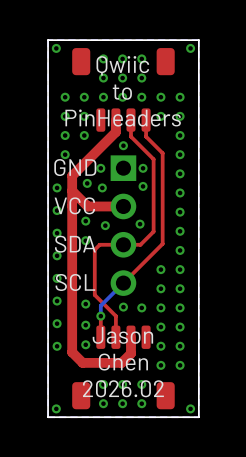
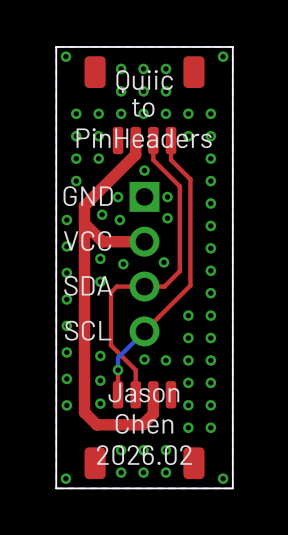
text: Qwiic (122, 65) -> Quiic (144, 81)

